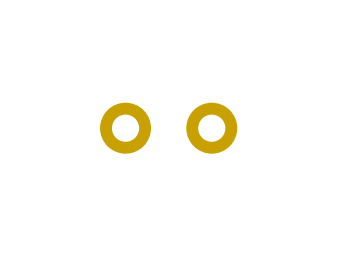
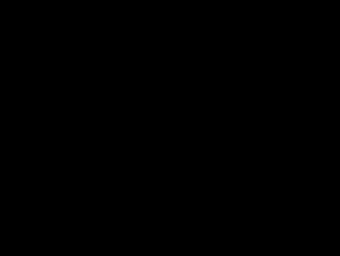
part: (168, 128) -> none

